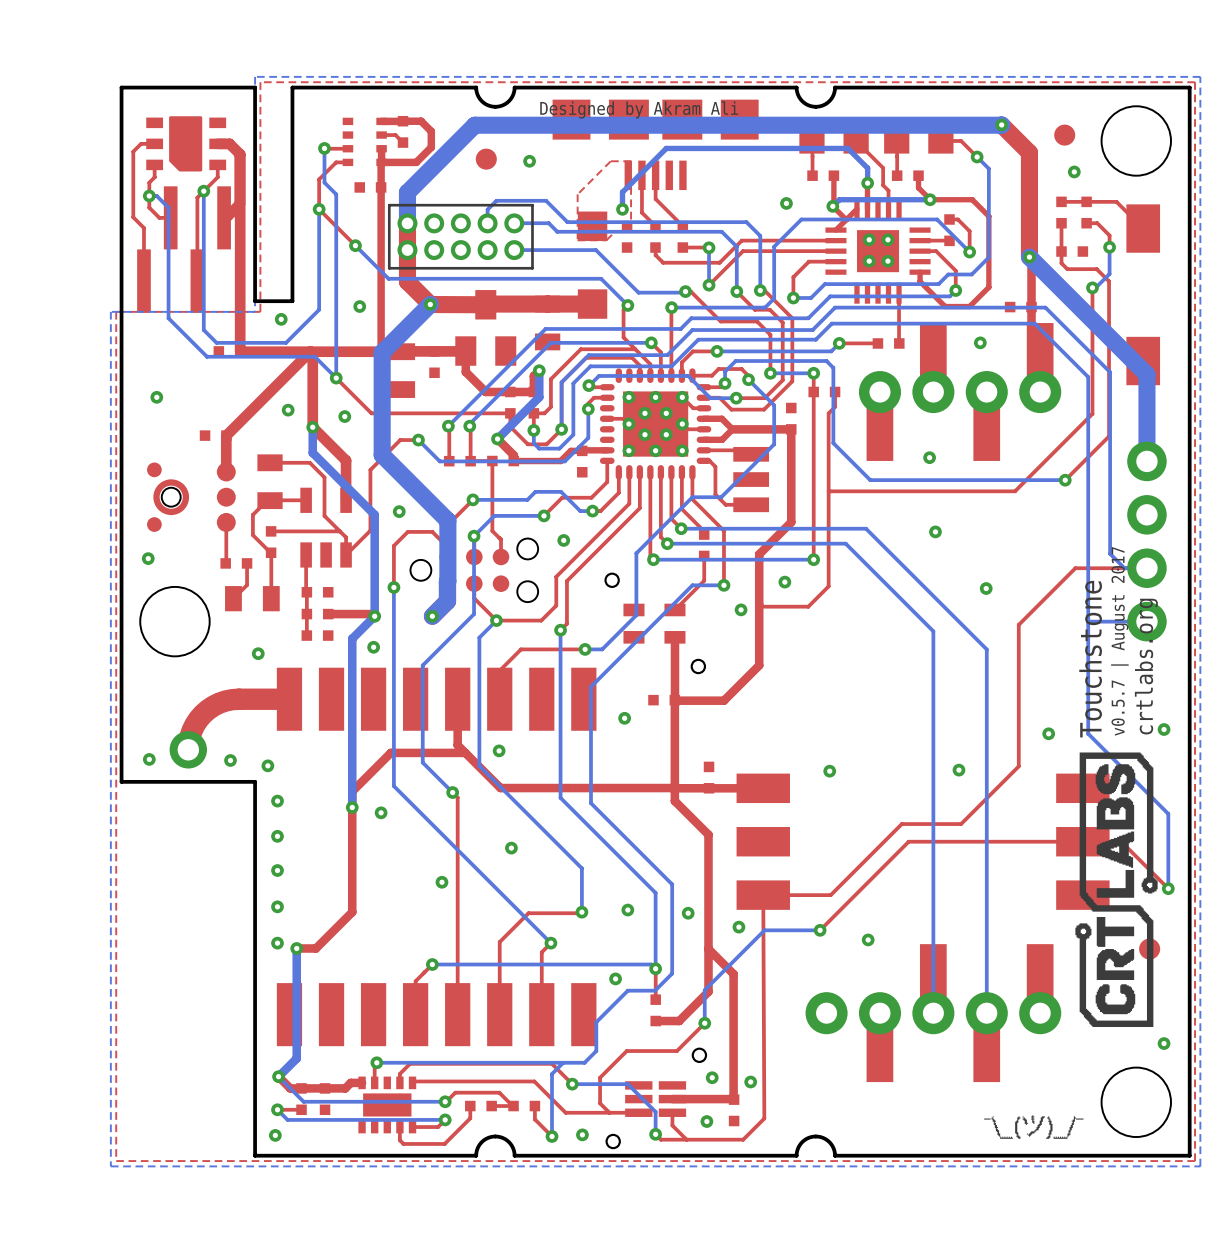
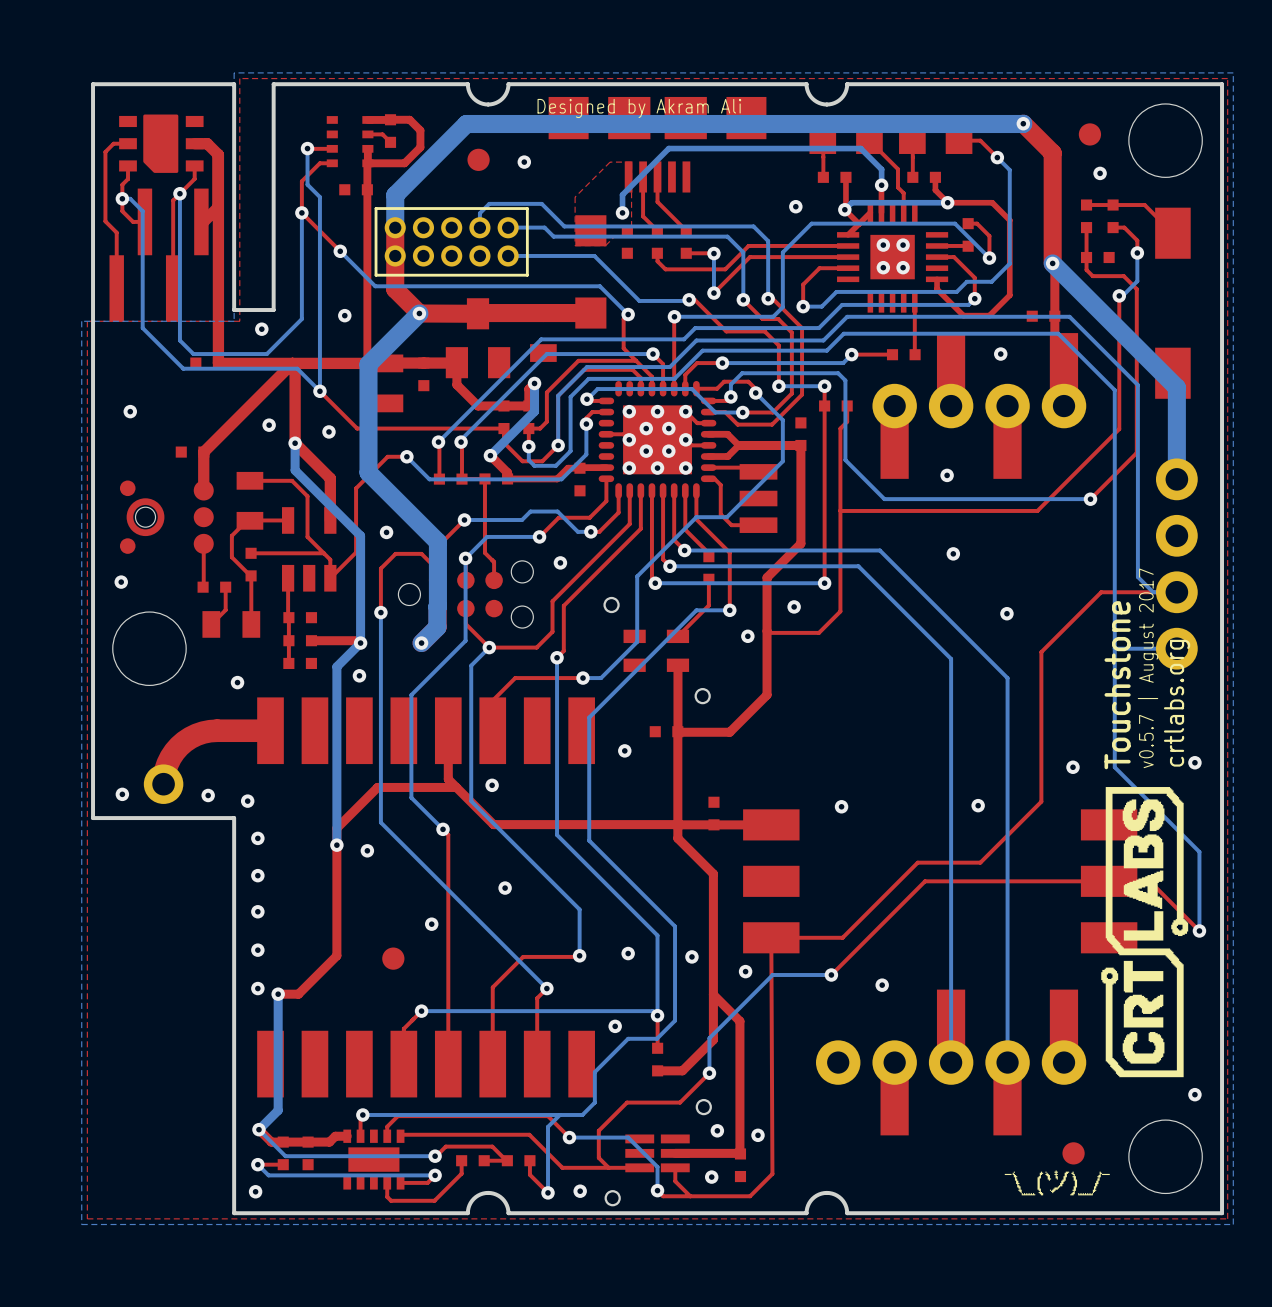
part: none -> (393, 958)
part position: (1149, 949) -> (1073, 1153)

